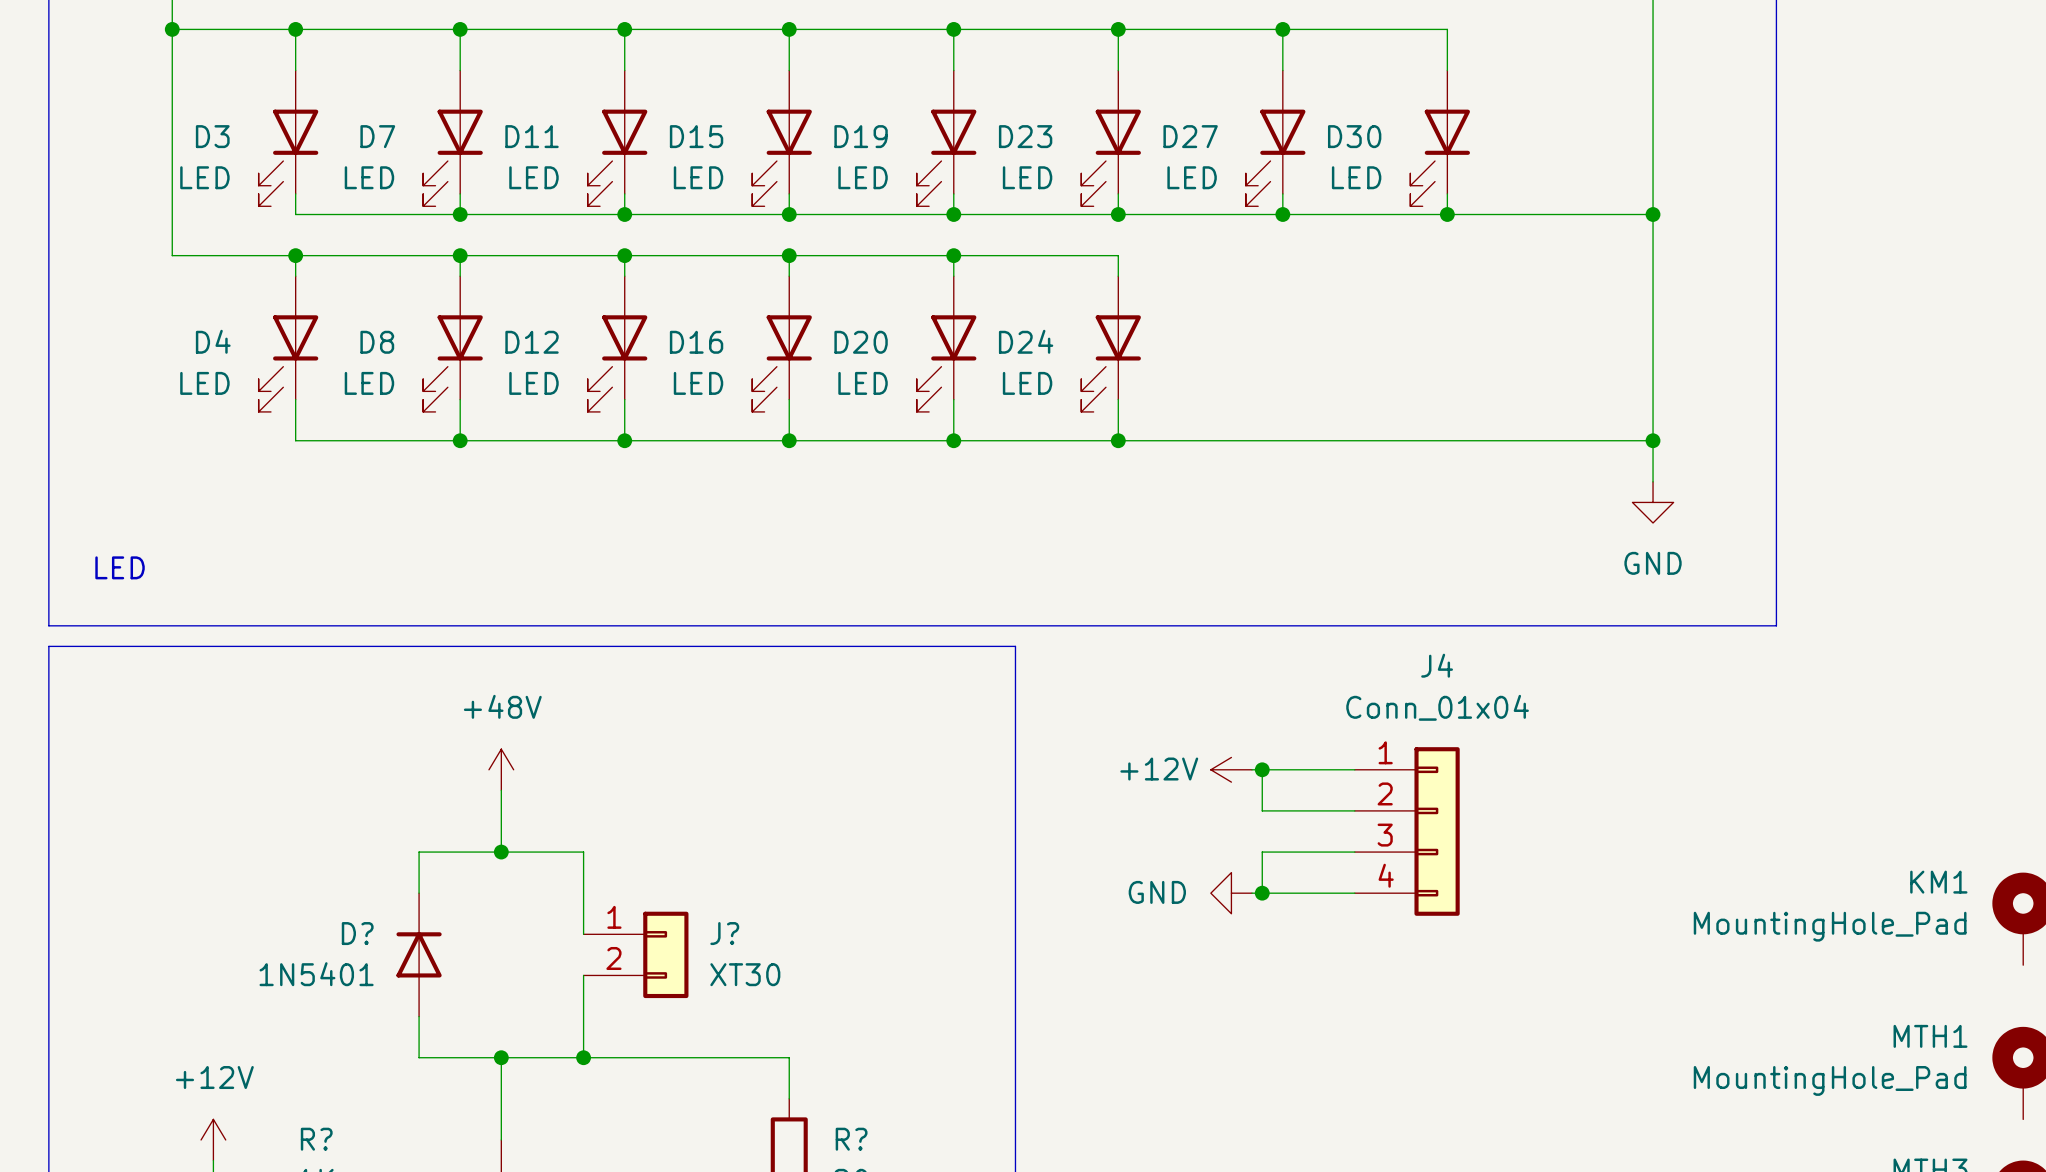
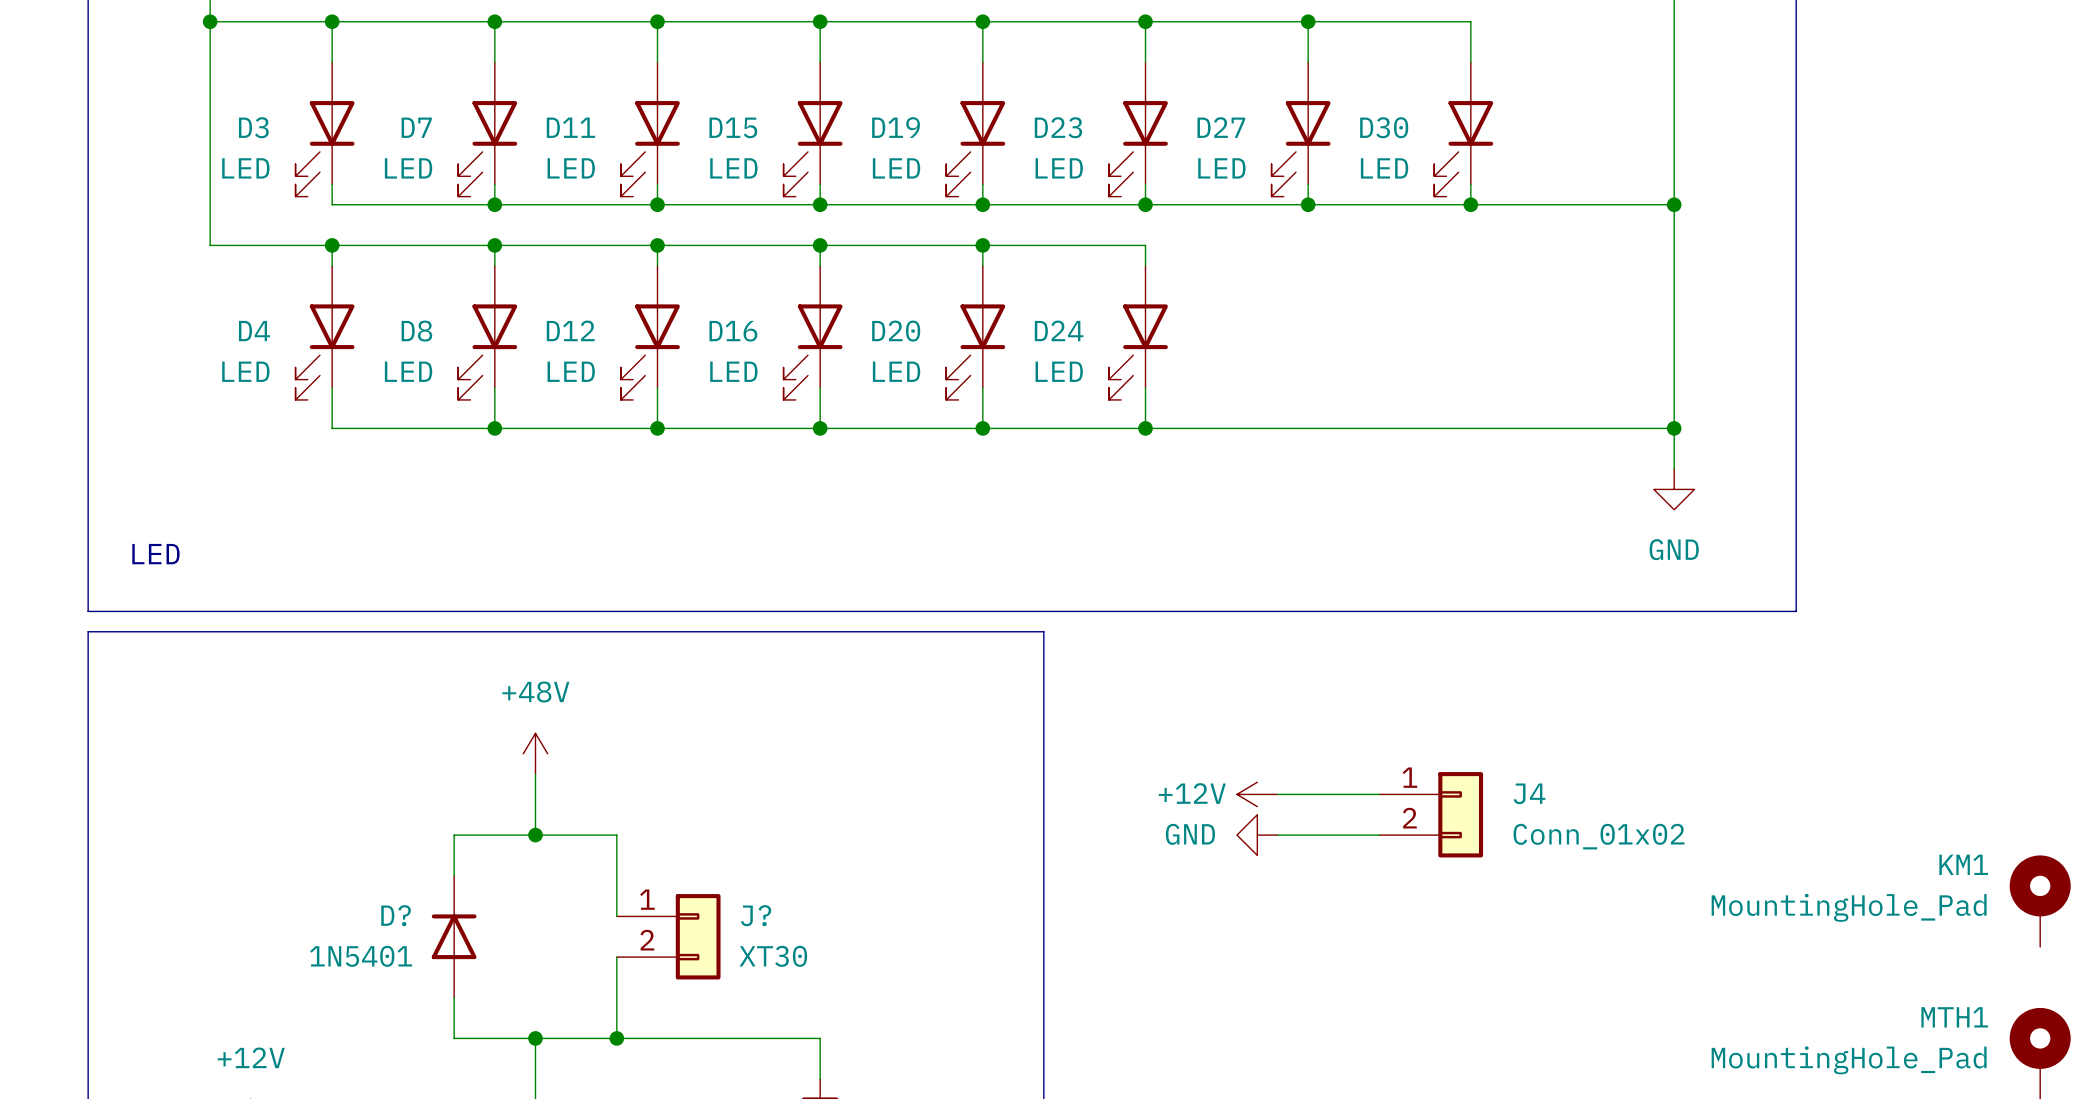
J4 name position: J4 (1437, 665) -> J4 (1529, 793)
J4 value: Conn_01x04 (1437, 707) -> Conn_01x02 (1599, 836)
J4 symbol: [1354, 747, 1460, 916] -> [1379, 772, 1484, 858]
power symbol position: +12V (1231, 769) -> +12V (1257, 794)
wire: (1251, 769) (1354, 769) -> none
wire: (1262, 769) (1262, 810) -> (1277, 794) (1287, 794)
junction: (1262, 769) -> none
wire: (1262, 852) (1262, 893) -> (1287, 835) (1277, 835)
power symbol position: GND (1231, 893) -> GND (1257, 835)
wire: (1251, 893) (1354, 893) -> none
junction: (1262, 893) -> none

